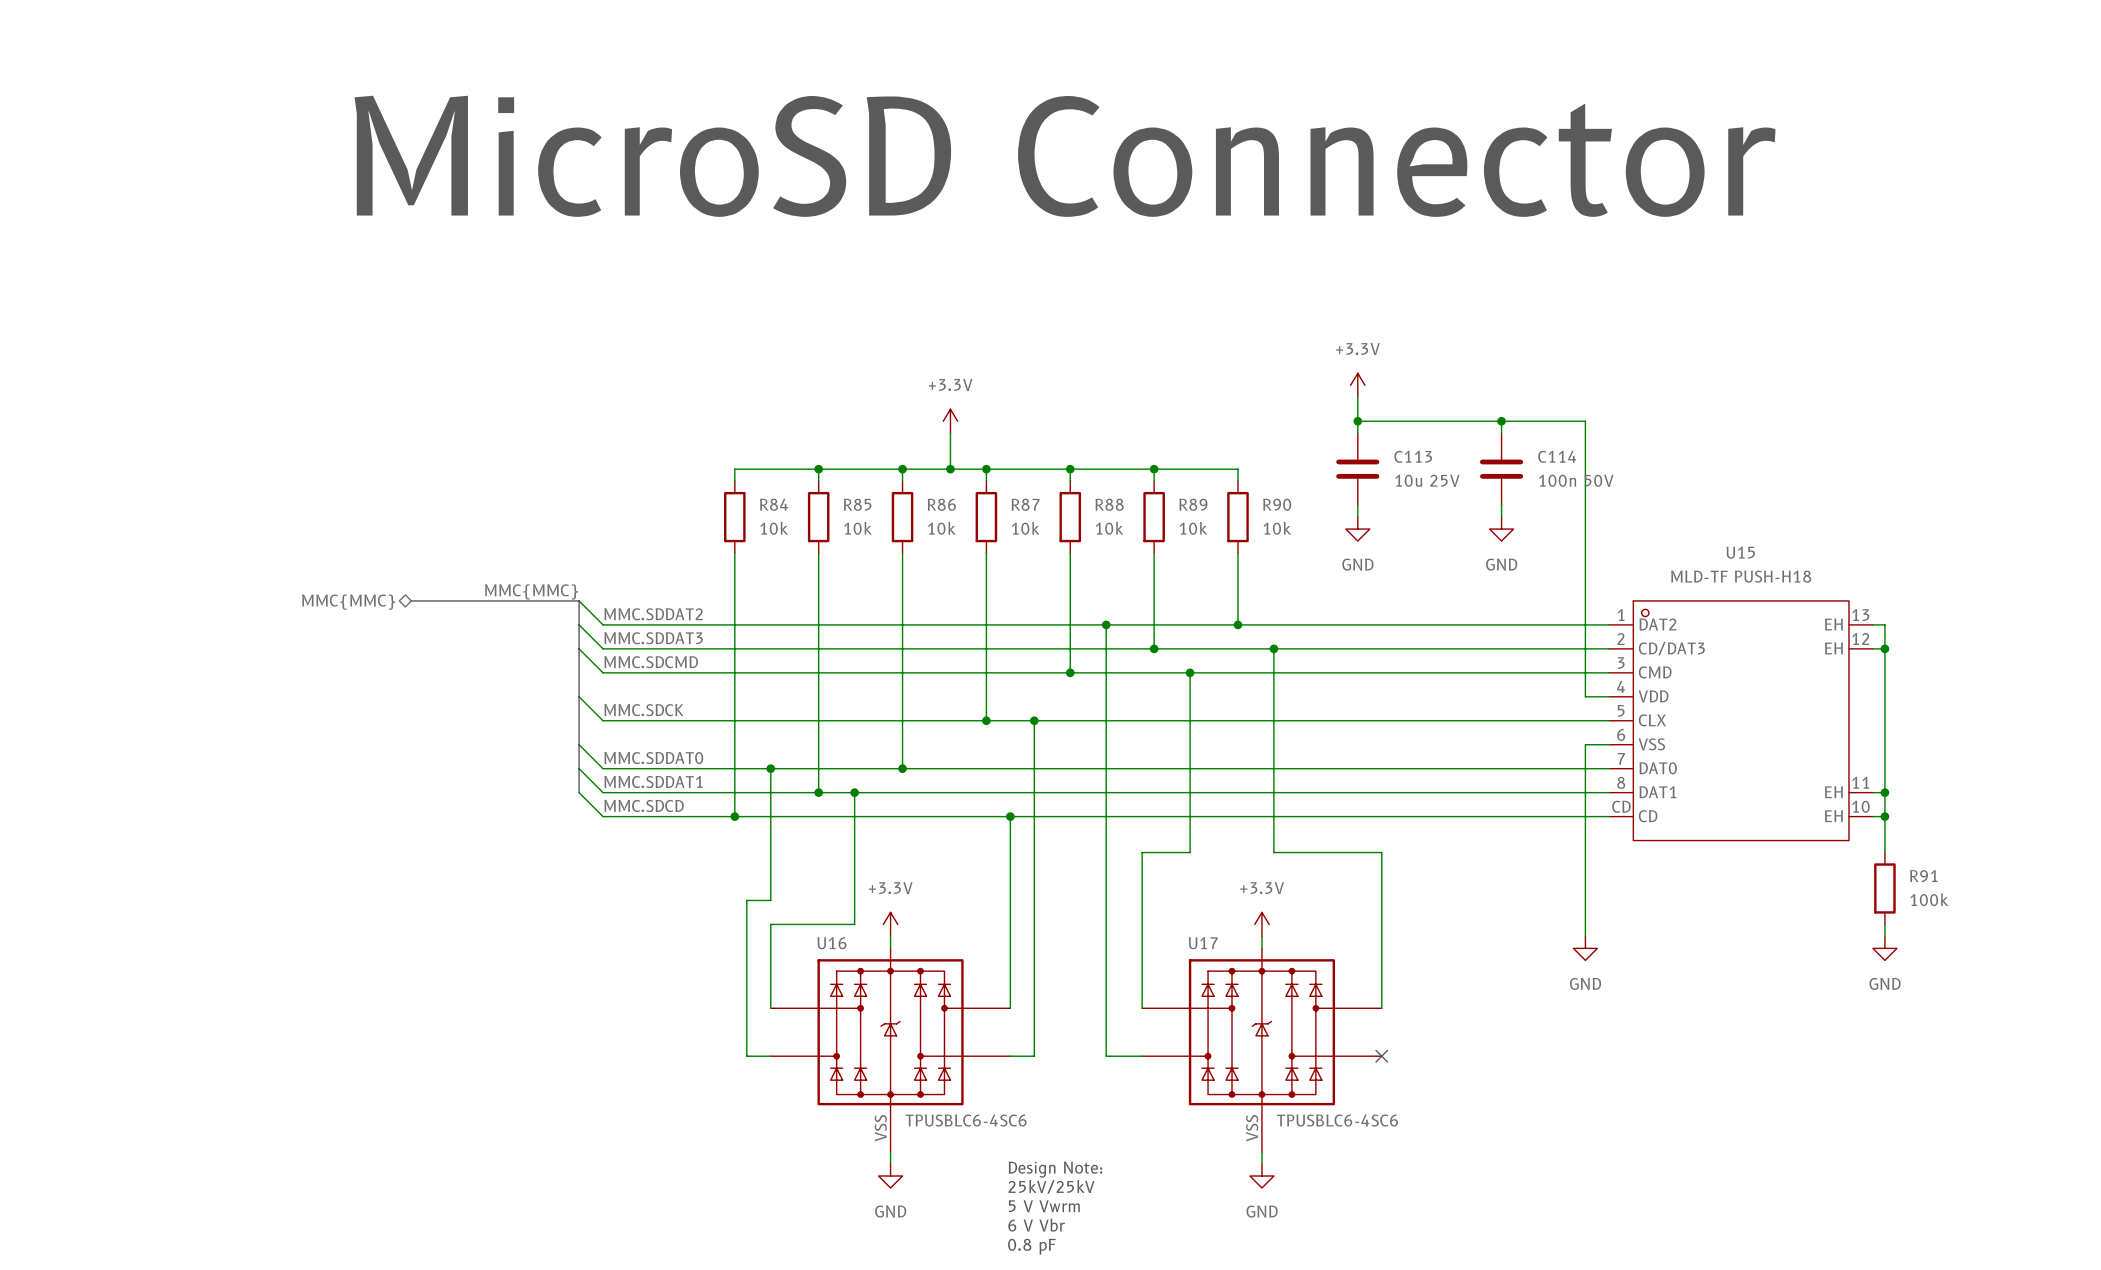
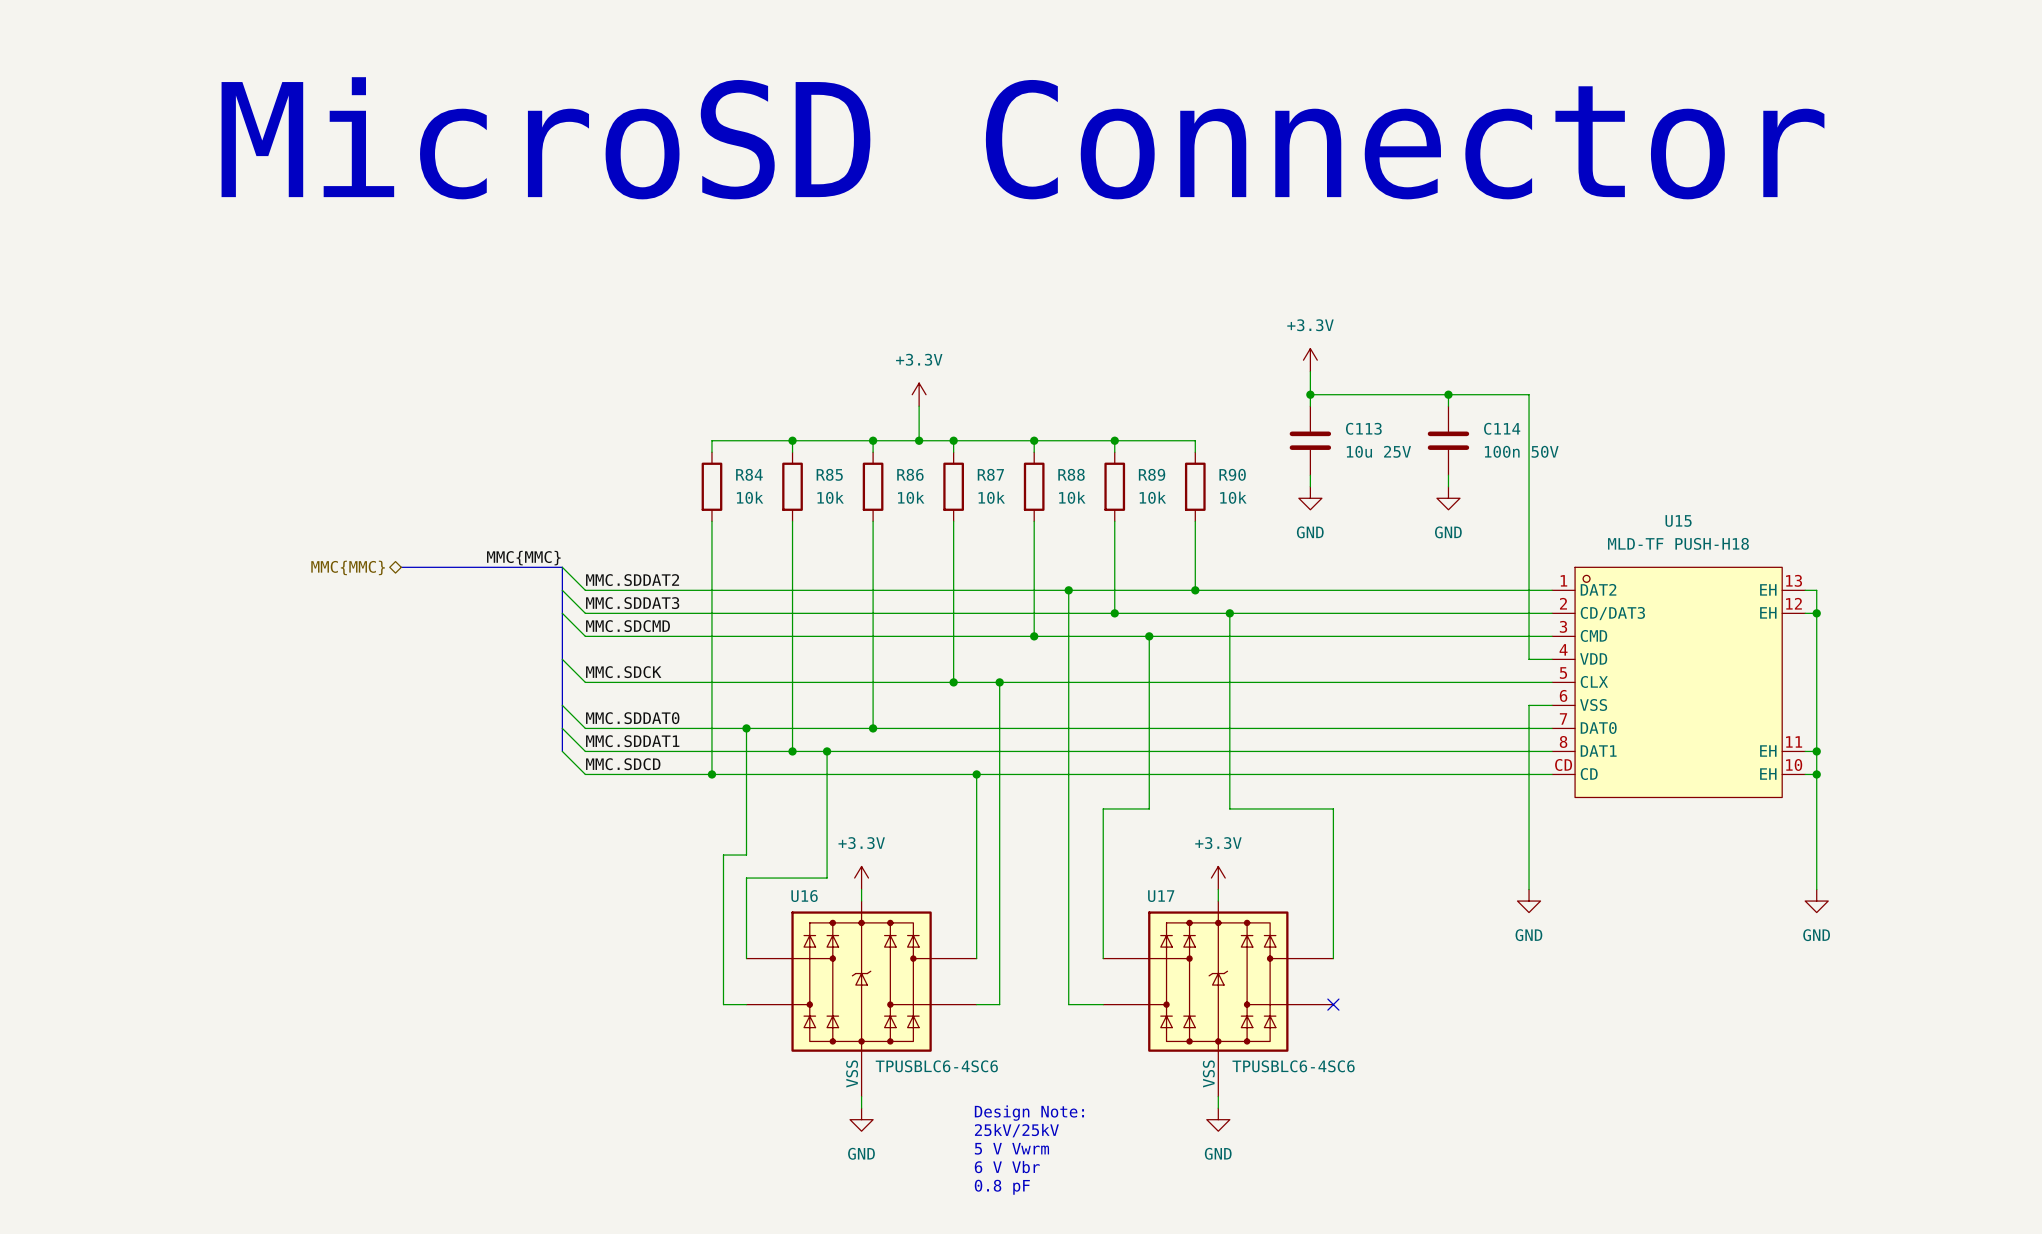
wire: none -> (1816, 808) (1816, 878)
R91: 100k (1884, 888) -> none

